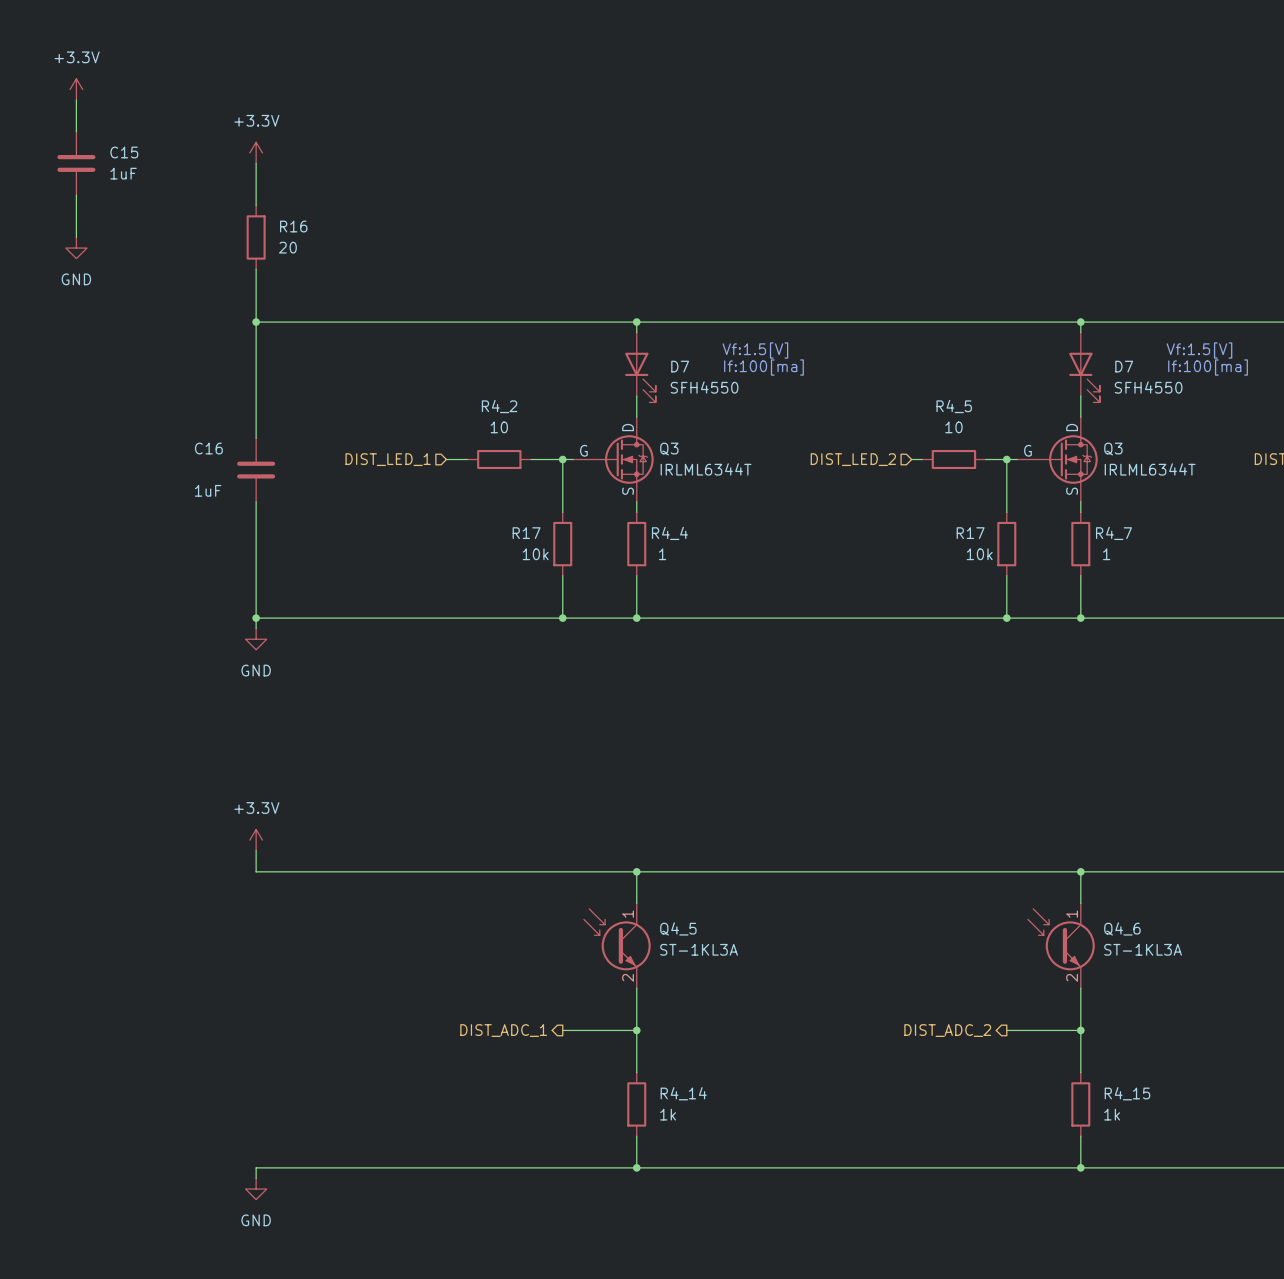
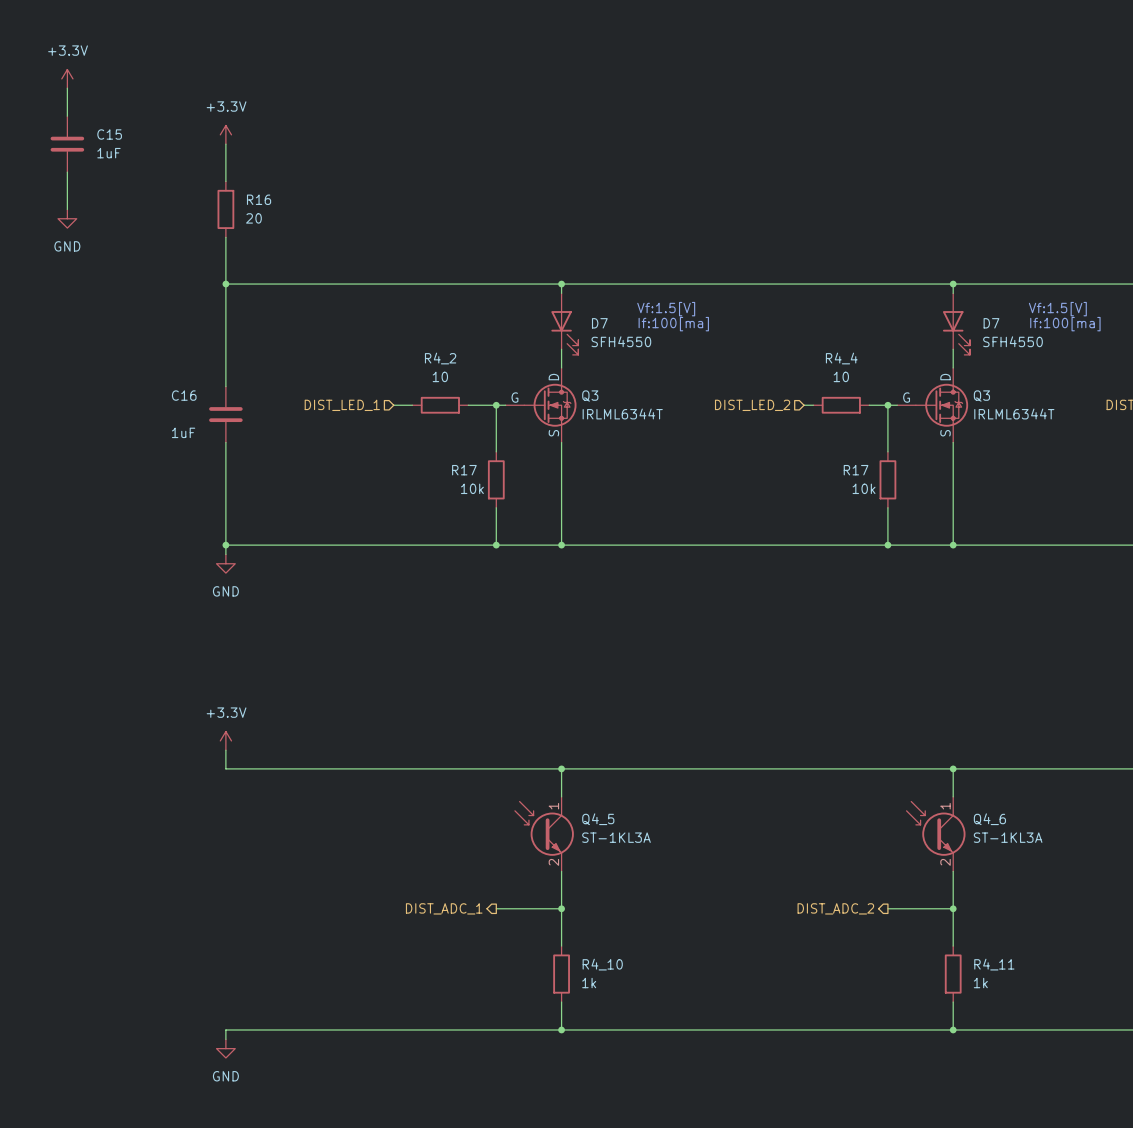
R4_5 name: R4_5 (954, 406) -> R4_4 (841, 358)
wire: none -> (561, 451) (561, 507)
wire: none -> (953, 451) (953, 507)
R4_4: 1 (636, 544) -> none
R4_7: 1 (1080, 544) -> none
R4_14 name: R4_14 (683, 1093) -> R4_10 (602, 964)
R4_15 name: R4_15 (1127, 1093) -> R4_11 (994, 964)

